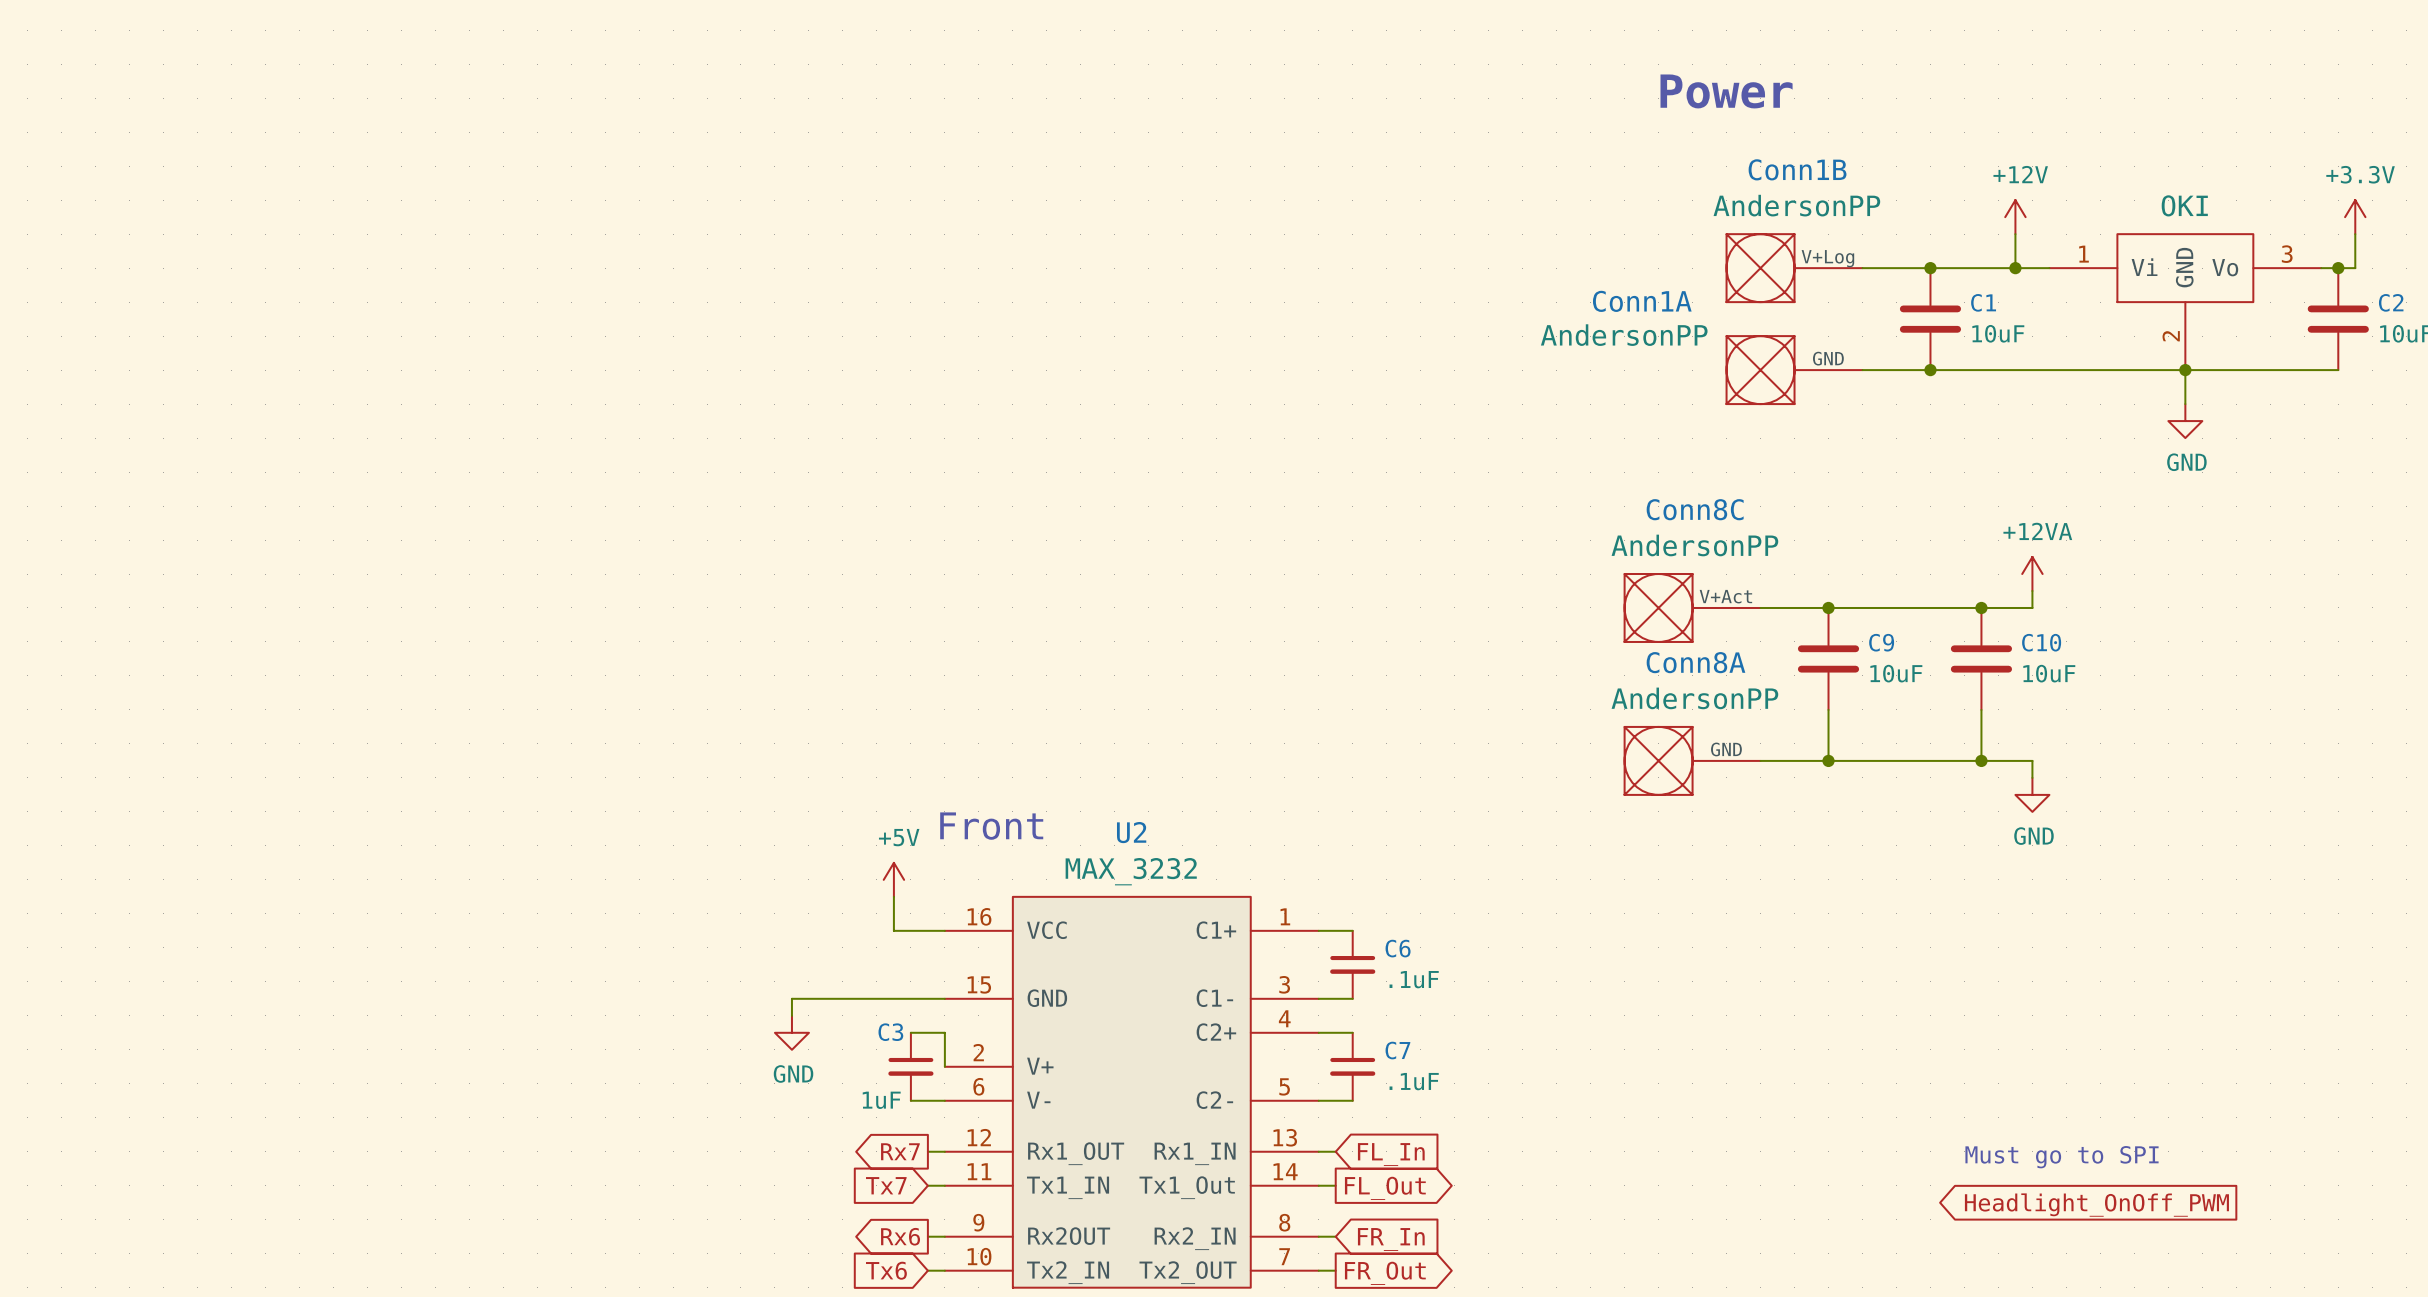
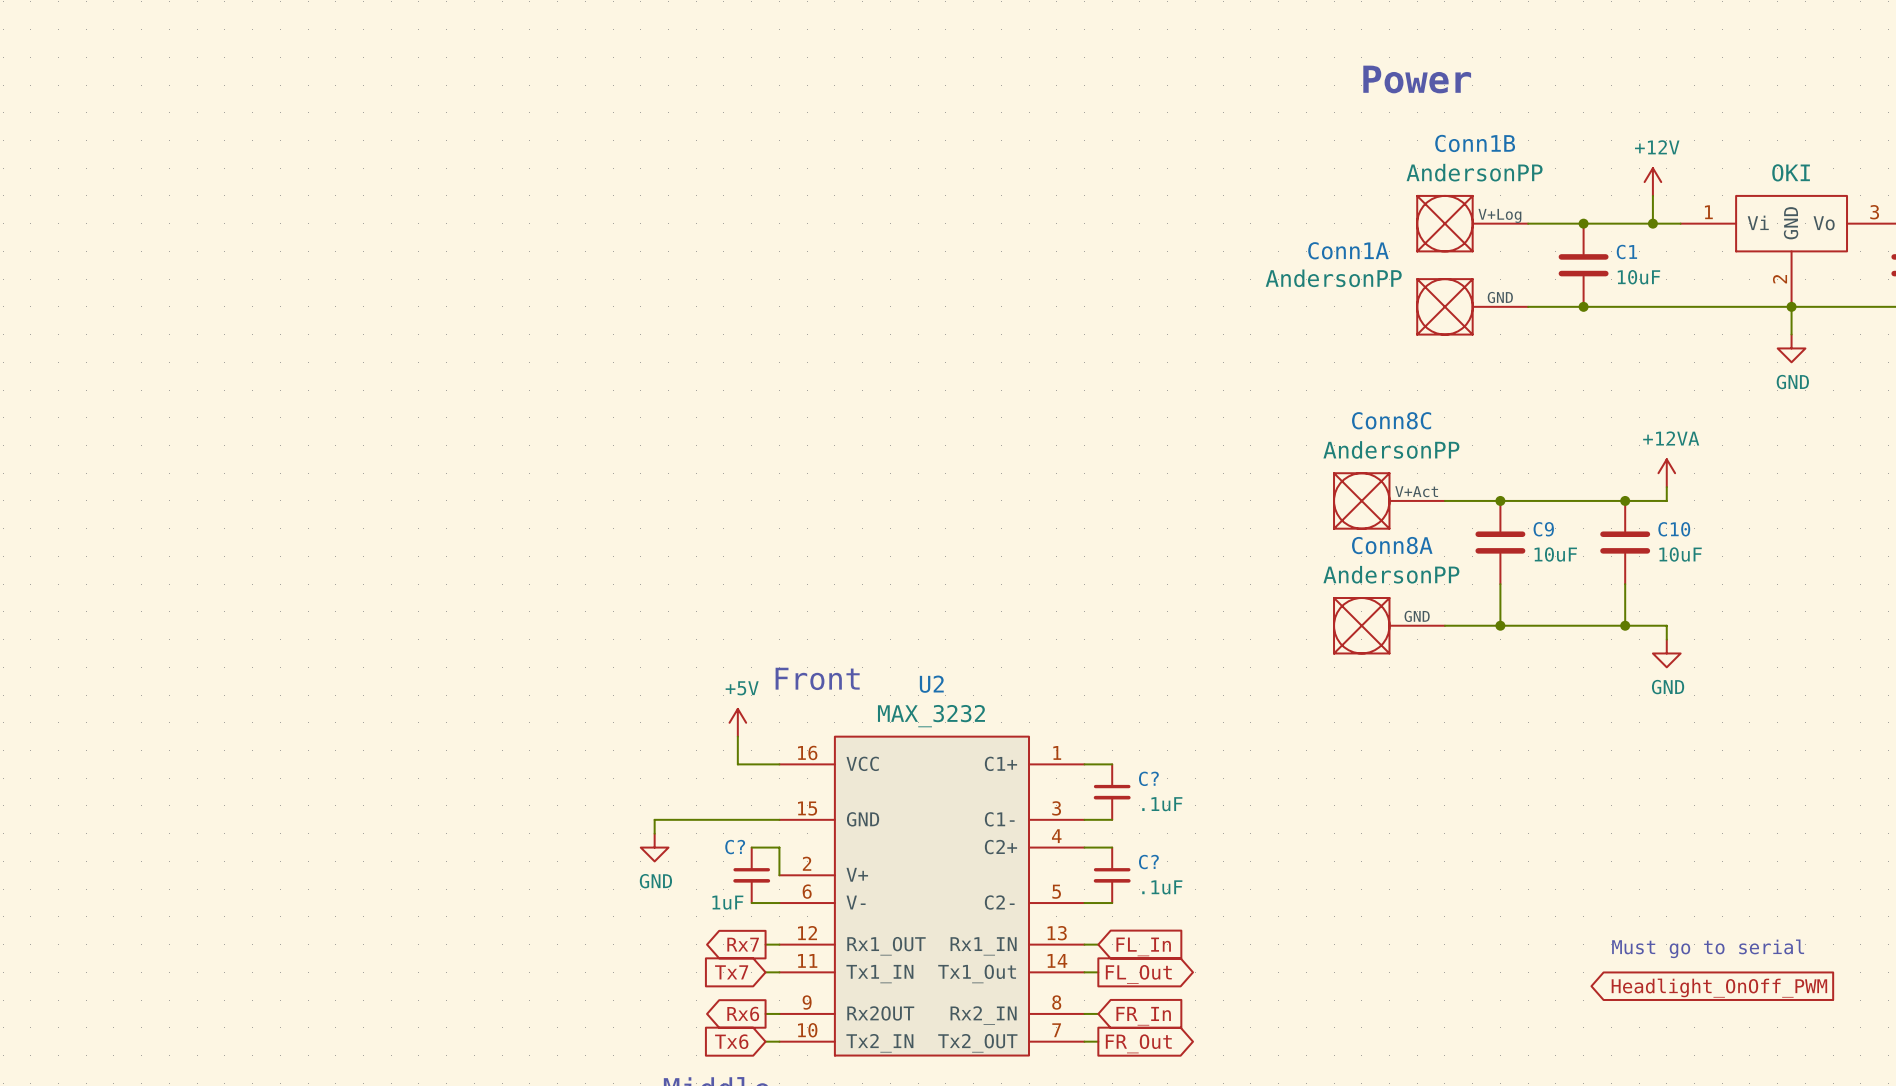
C6 name: C6 (1398, 948) -> C? (1148, 778)
C3 name: C3 (890, 1032) -> C? (735, 847)
C7 name: C7 (1397, 1050) -> C? (1148, 862)
text: Must go to SPI (2062, 1157) -> Must go to serial (1708, 948)

